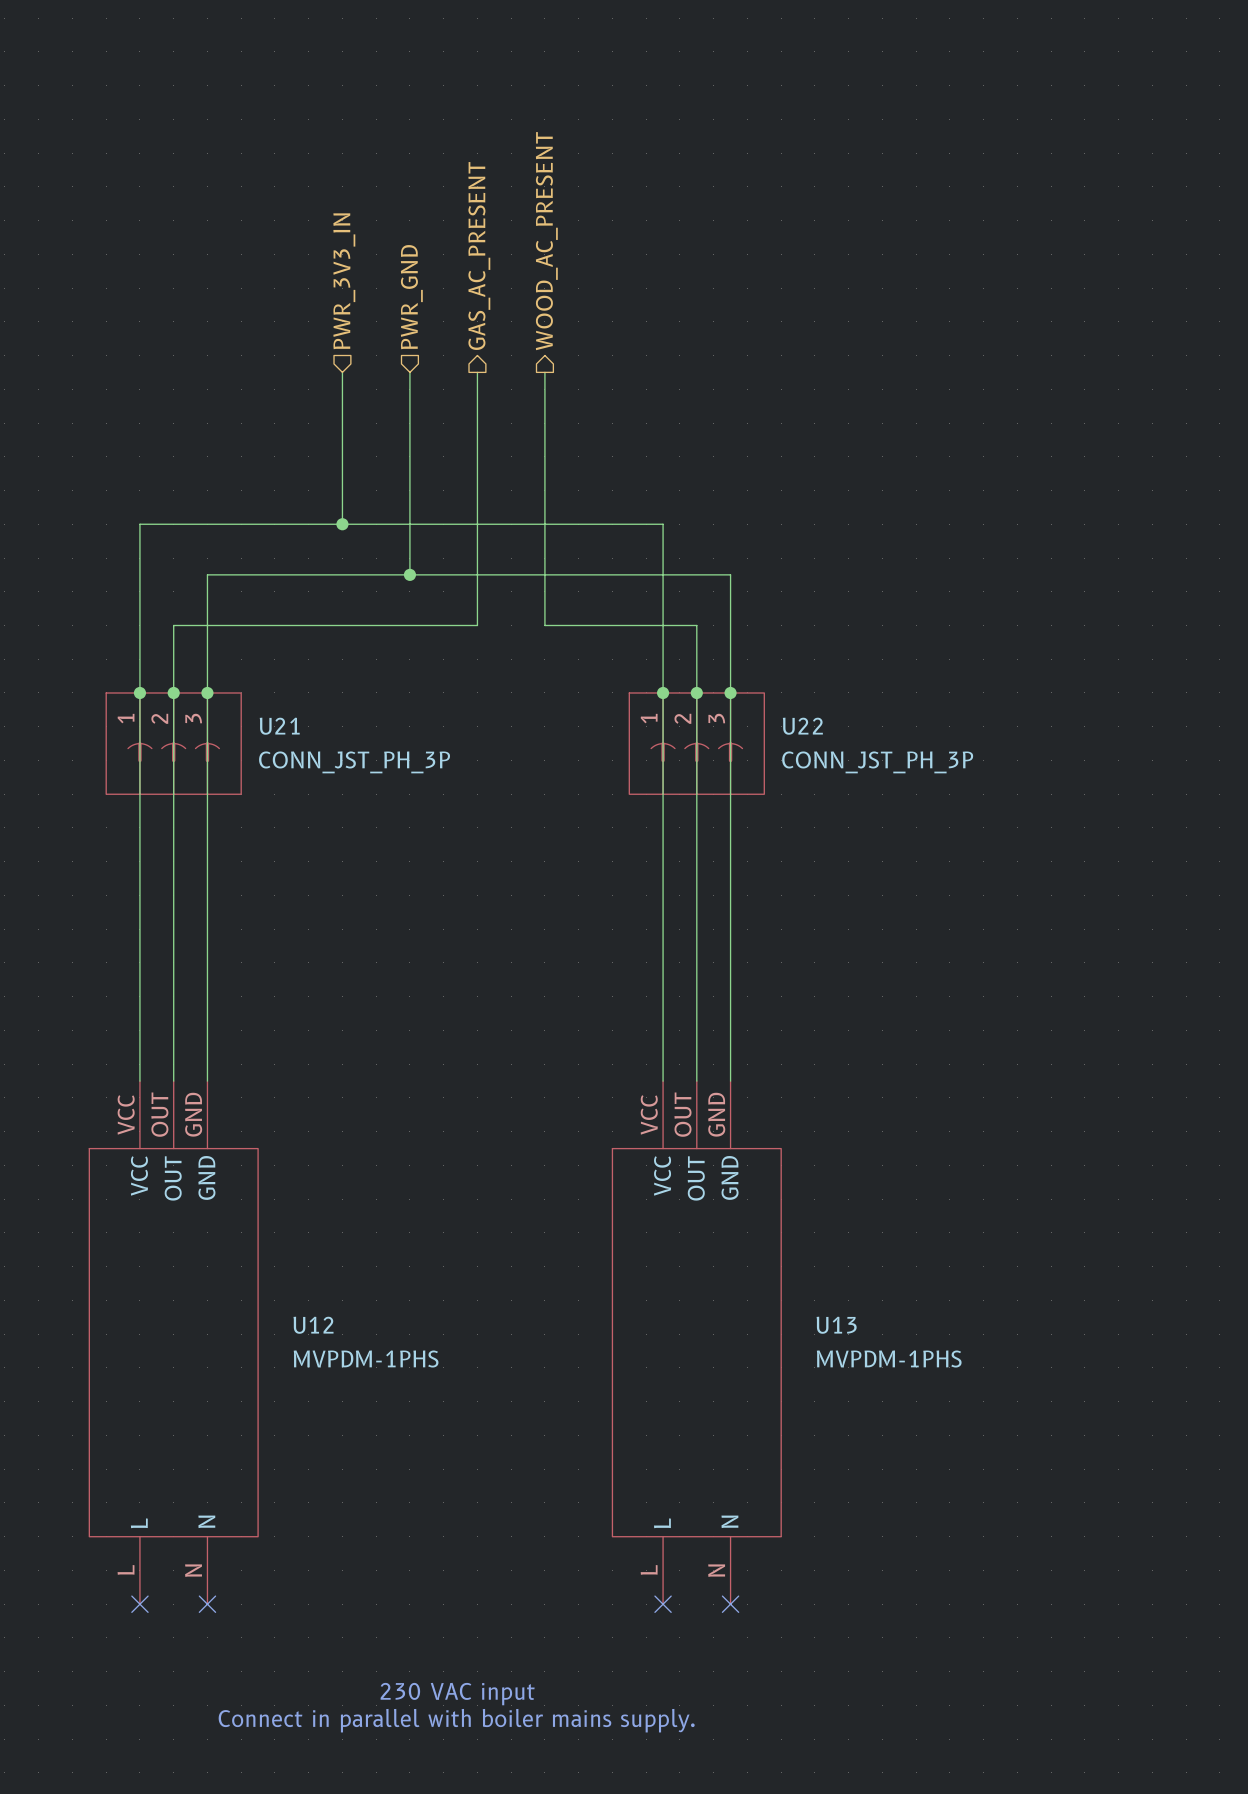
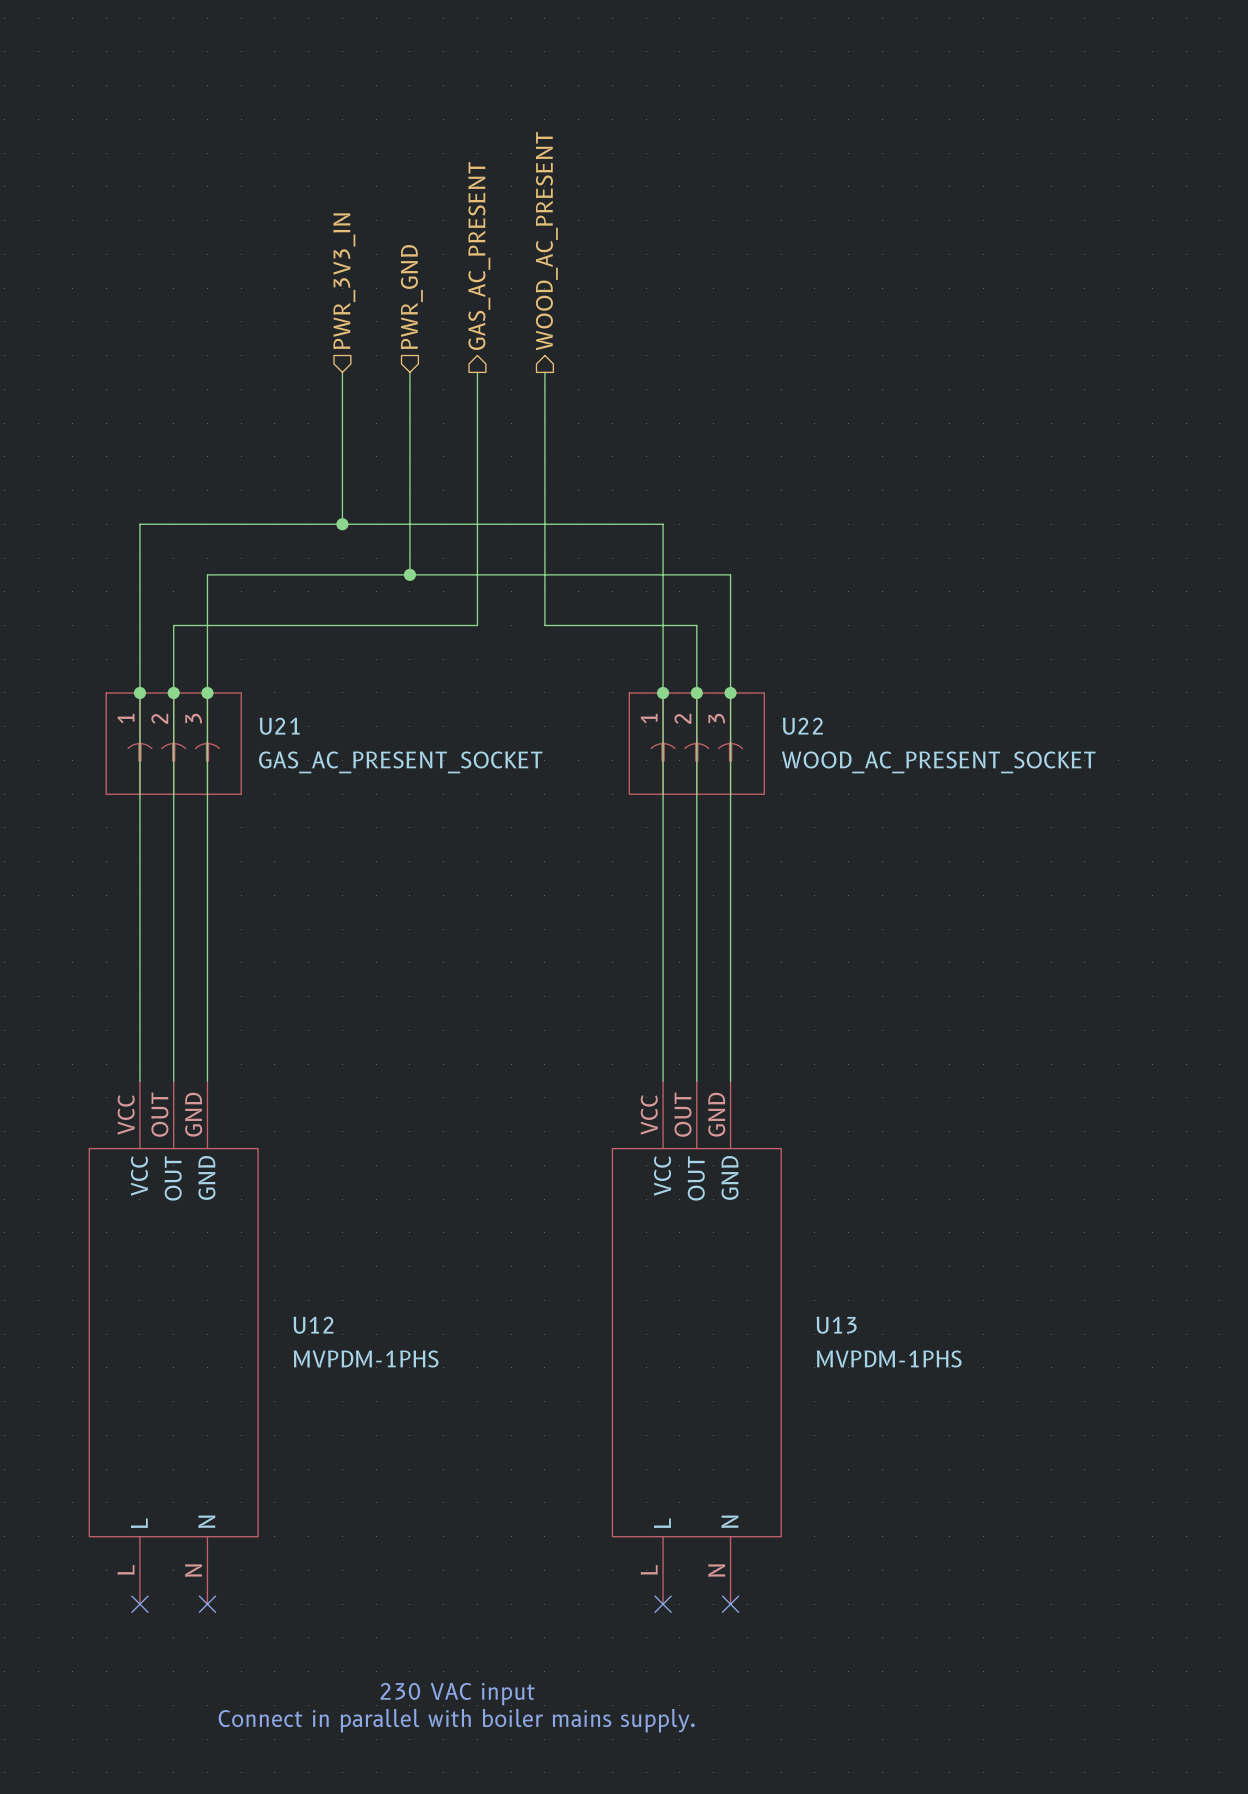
U21 value: CONN_JST_PH_3P (354, 762) -> GAS_AC_PRESENT_SOCKET (400, 762)
U22 value: CONN_JST_PH_3P (877, 762) -> WOOD_AC_PRESENT_SOCKET (938, 762)

